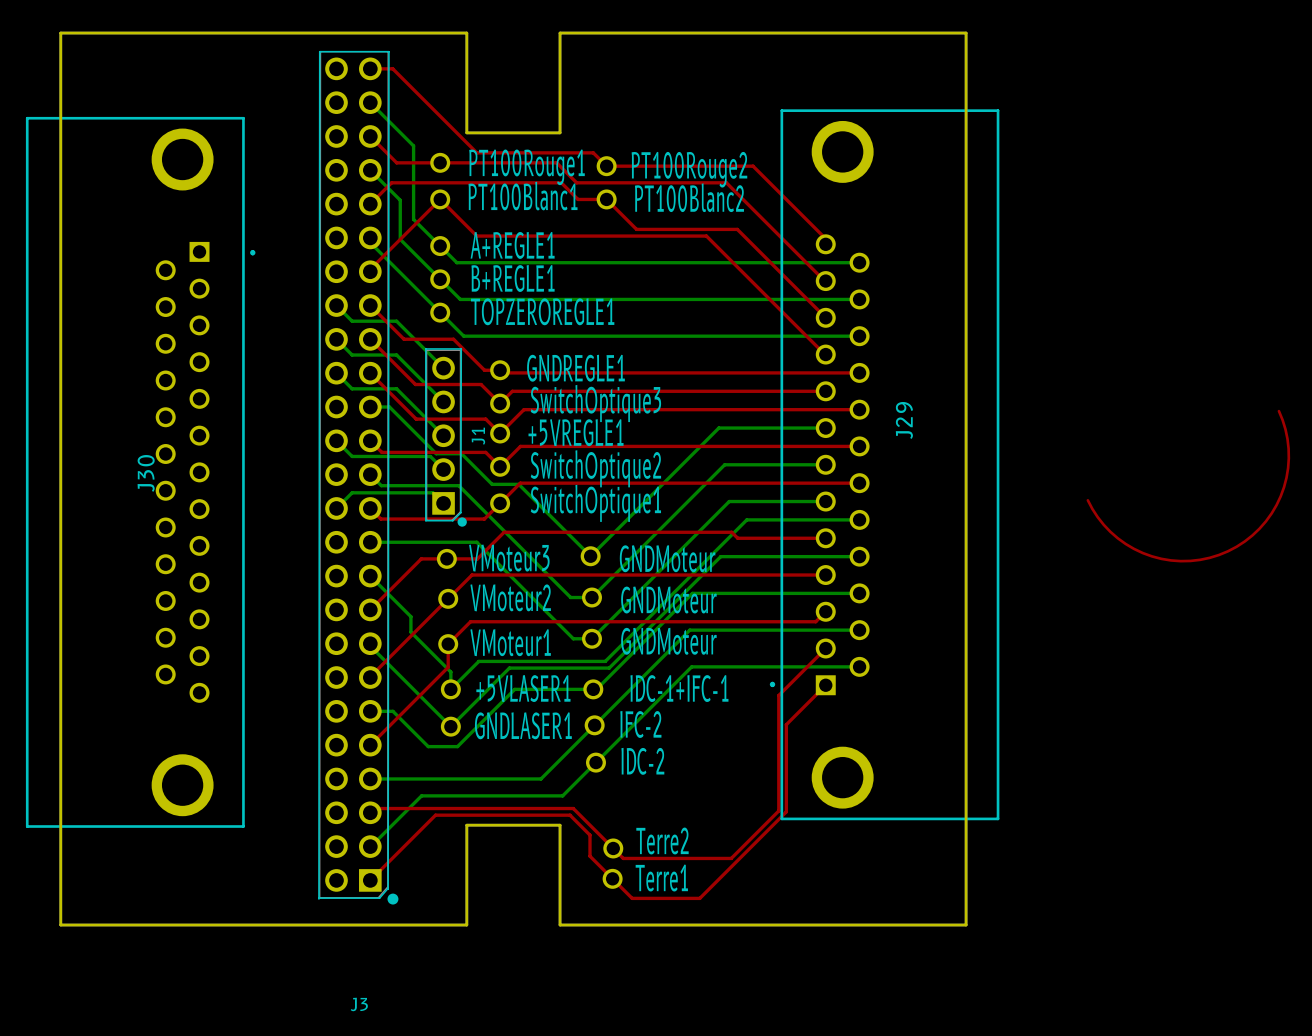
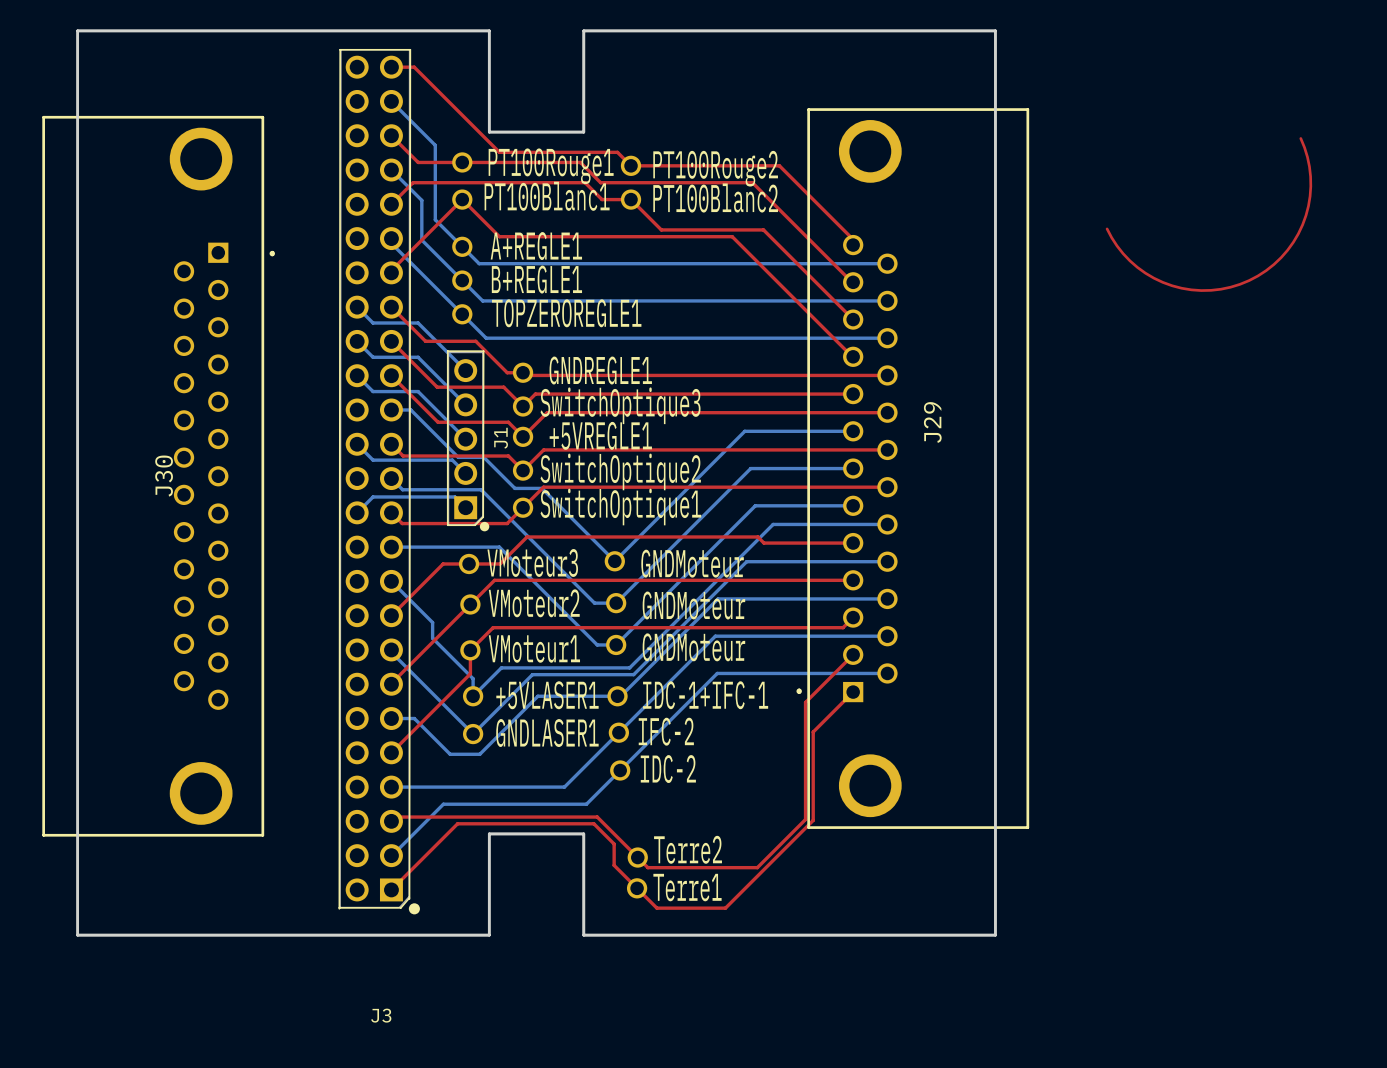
top track: (1278, 411) (1285, 429) (1288, 448) (1288, 468) (1280, 496) (1271, 513) (1259, 528) (1244, 541) (1228, 551) (1209, 557) (1190, 560) (1171, 560) (1142, 553) (1125, 543) (1110, 531) (1097, 517) (1087, 500) -> (1300, 138) (1307, 157) (1310, 176) (1310, 196) (1305, 215) (1298, 233) (1287, 250) (1273, 264) (1249, 280) (1230, 287) (1211, 290) (1191, 289) (1172, 285) (1153, 278) (1137, 267) (1123, 253) (1107, 228)

